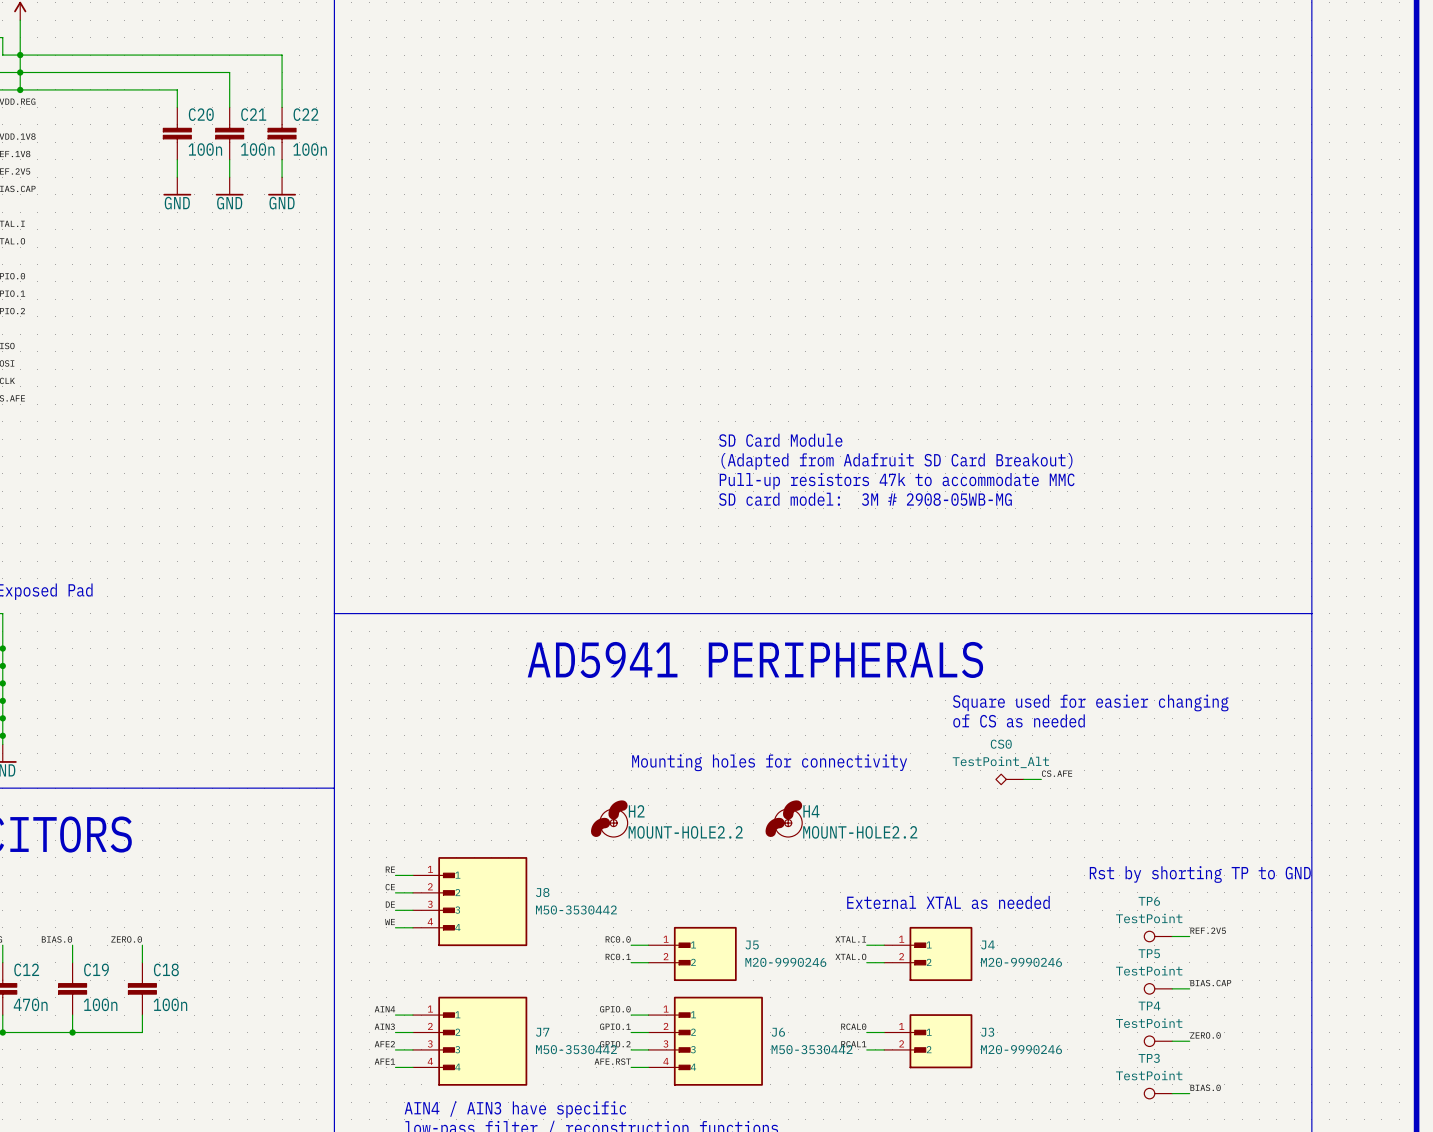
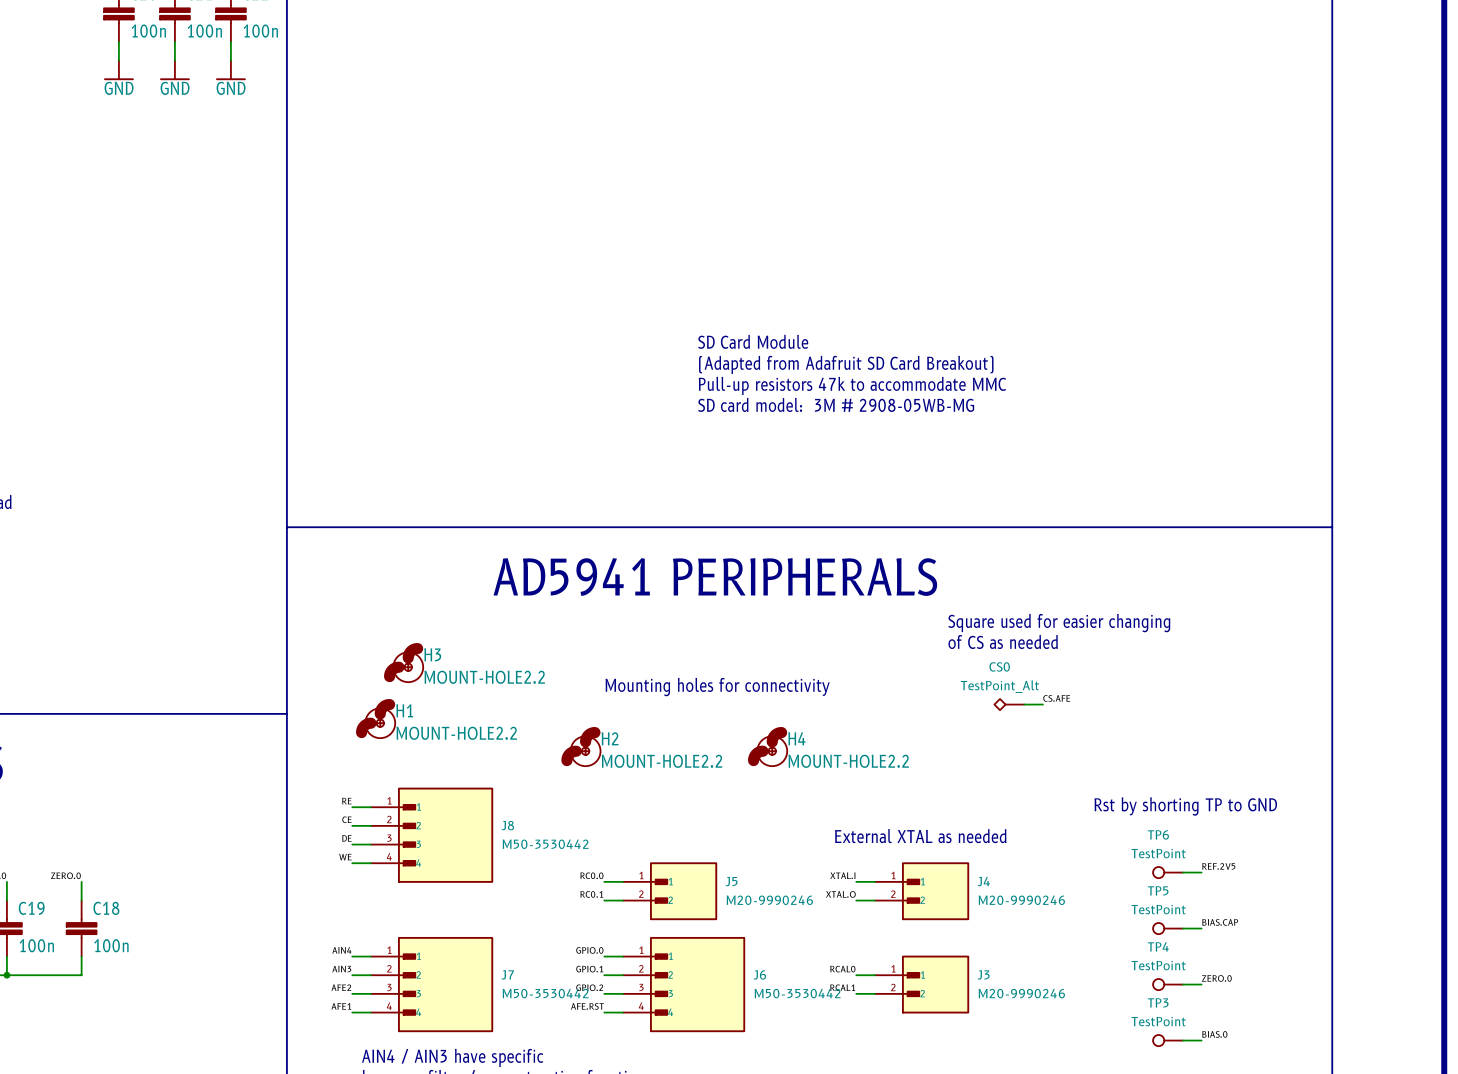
H3: none -> MOUNT-HOLE2.2 (403, 662)
H1: none -> MOUNT-HOLE2.2 (375, 718)

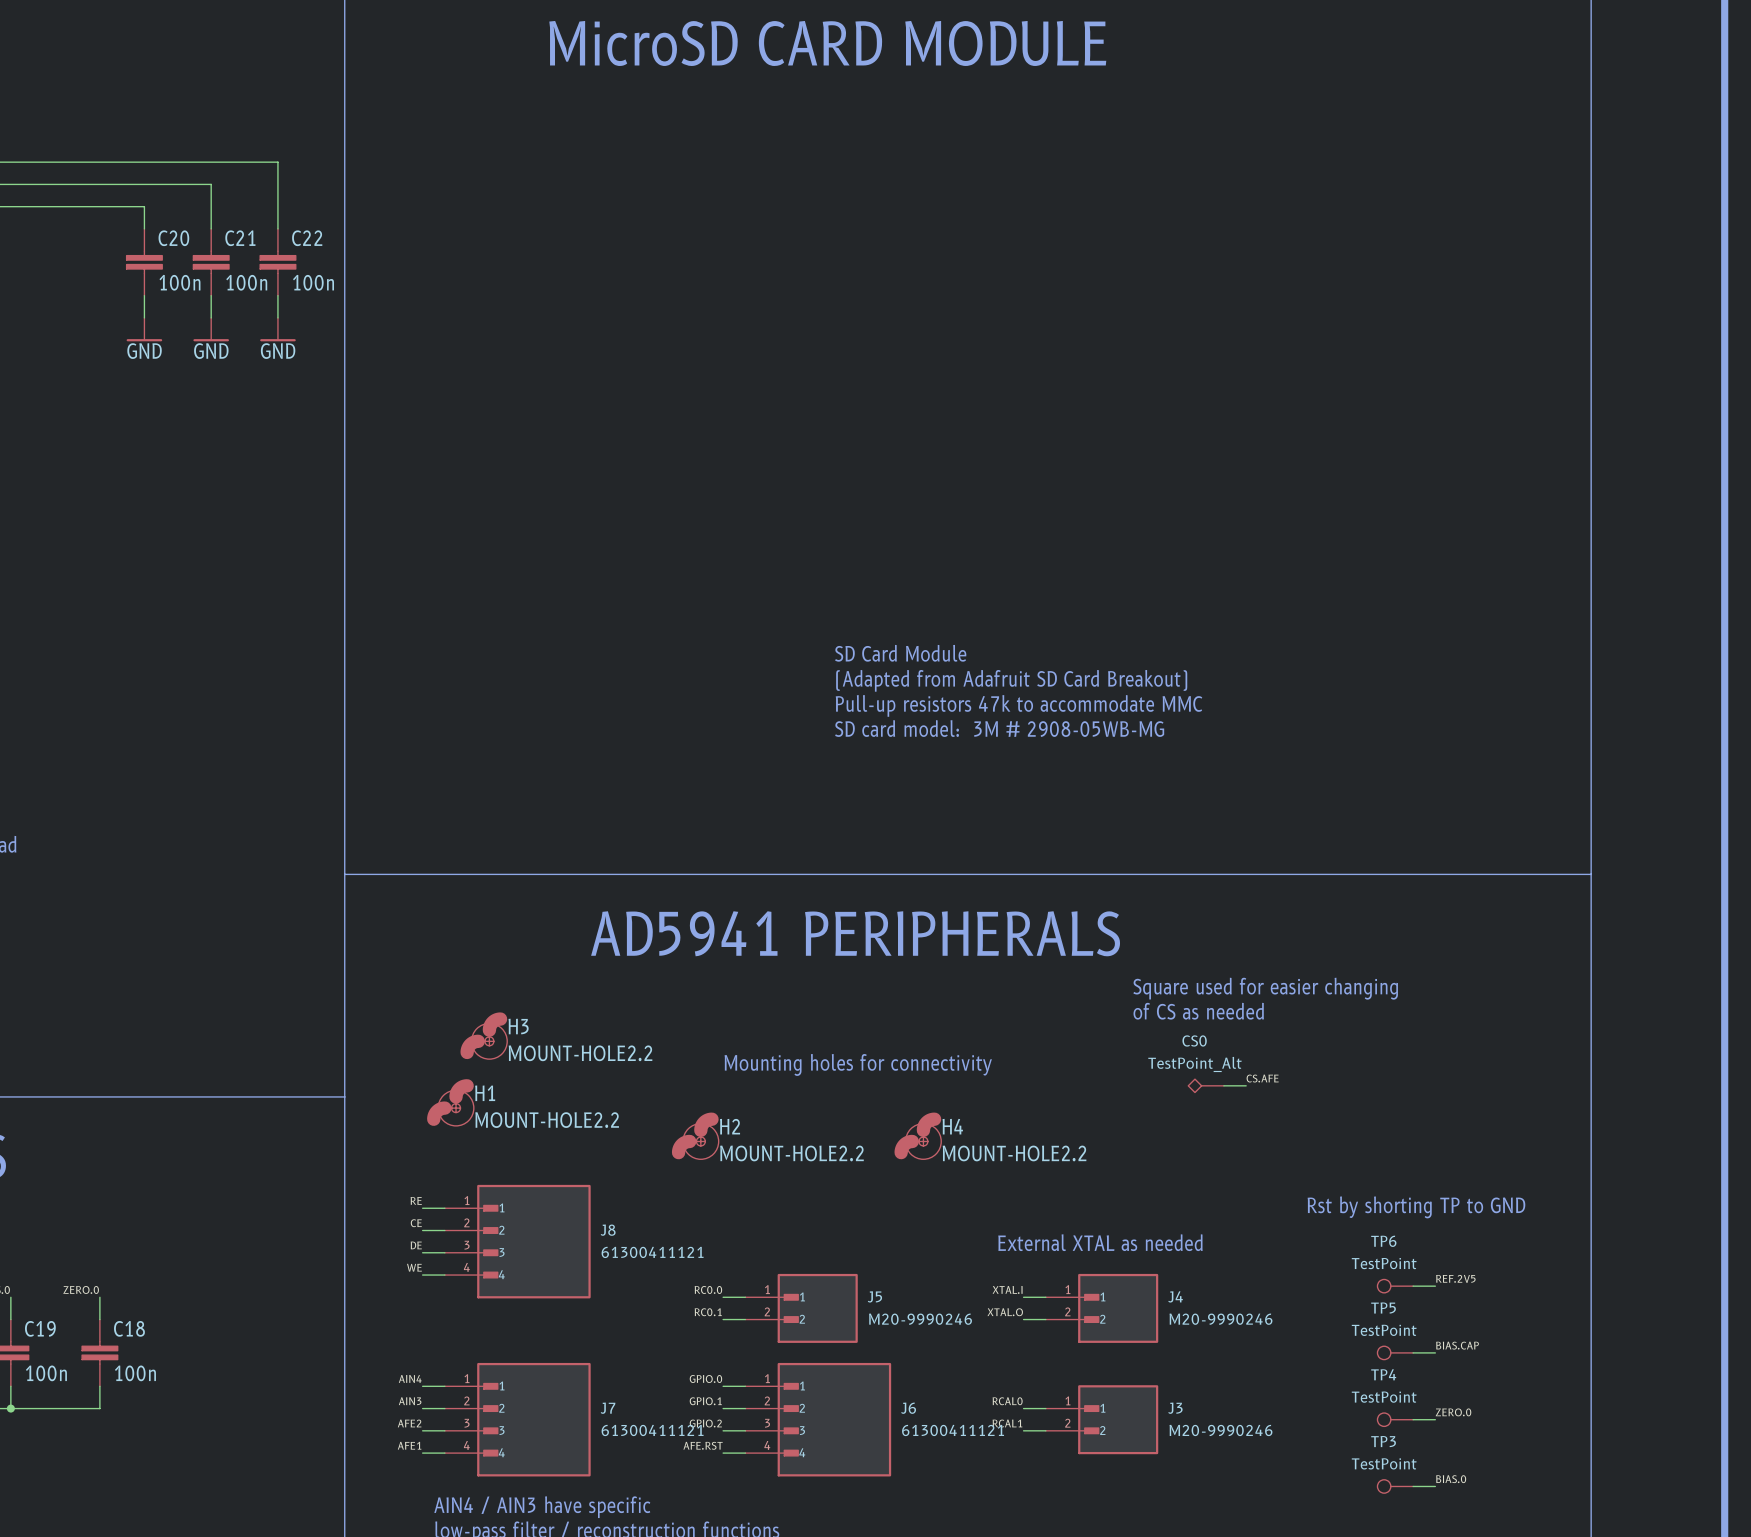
J8 value: M50-3530442 (545, 844) -> 61300411121 (652, 1252)
J7 value: M50-3530442 (545, 993) -> 61300411121 (652, 1430)
J6 value: M50-3530442 (797, 993) -> 61300411121 (953, 1430)

